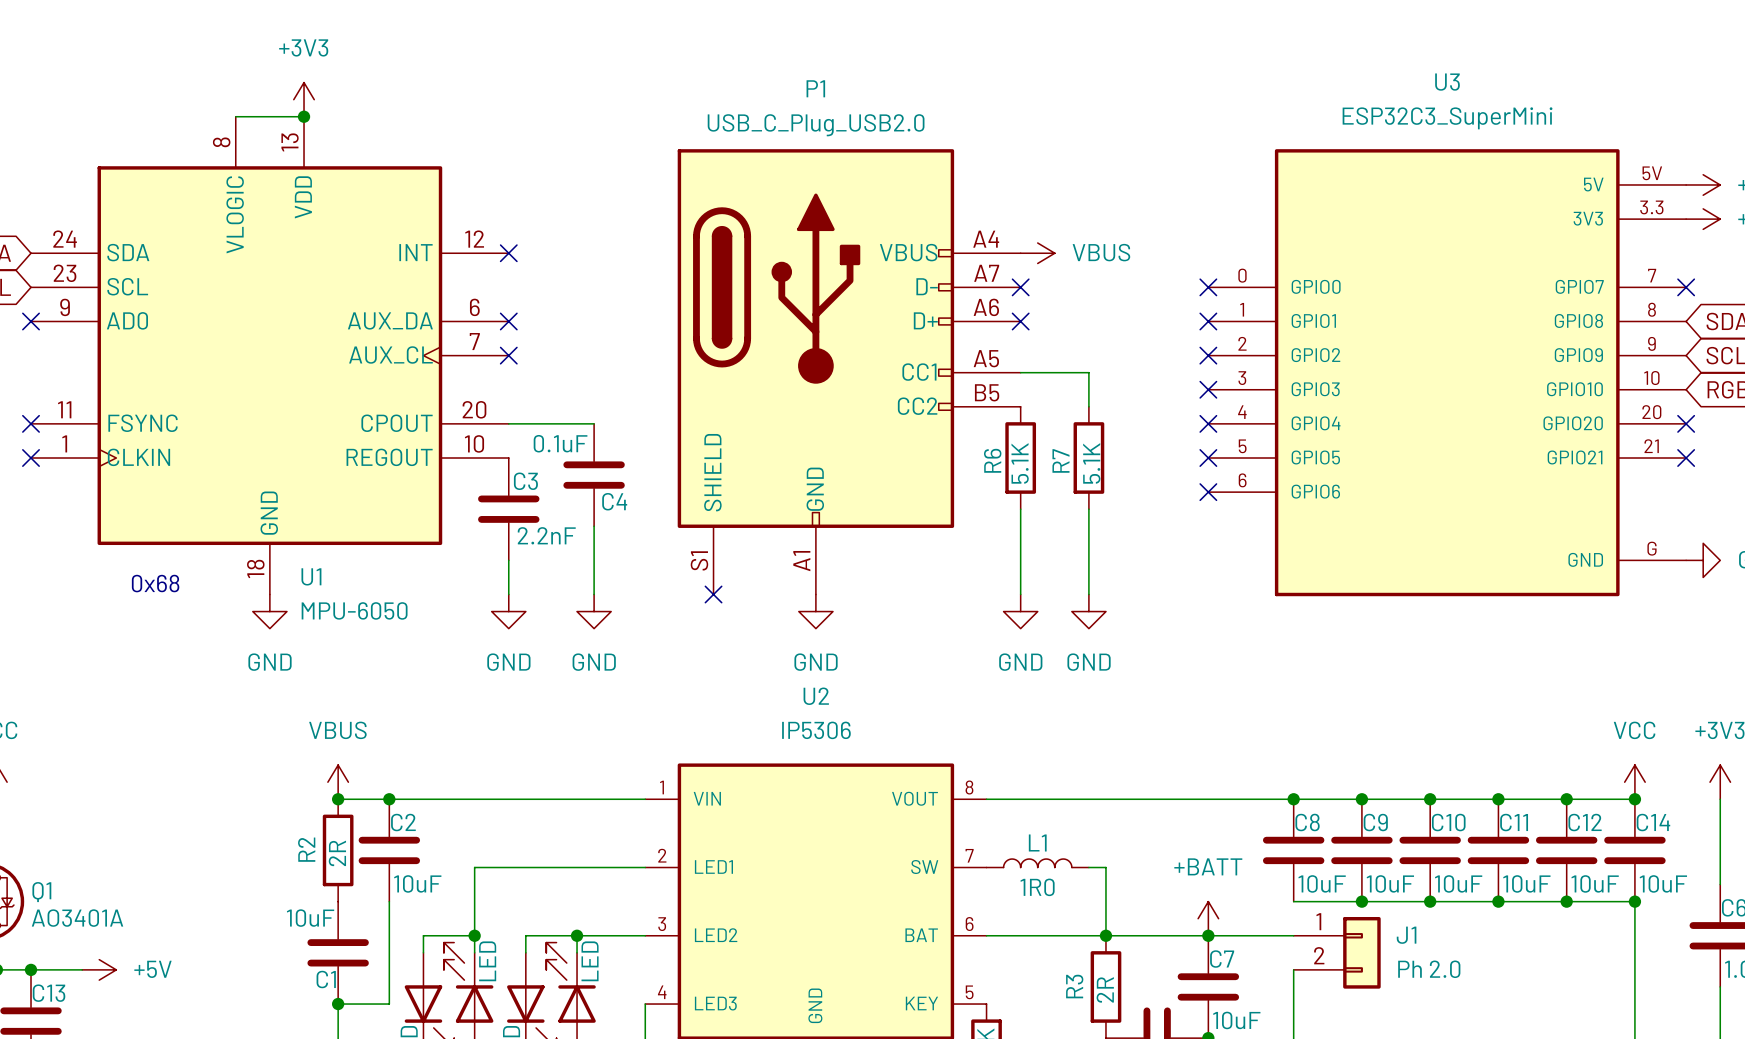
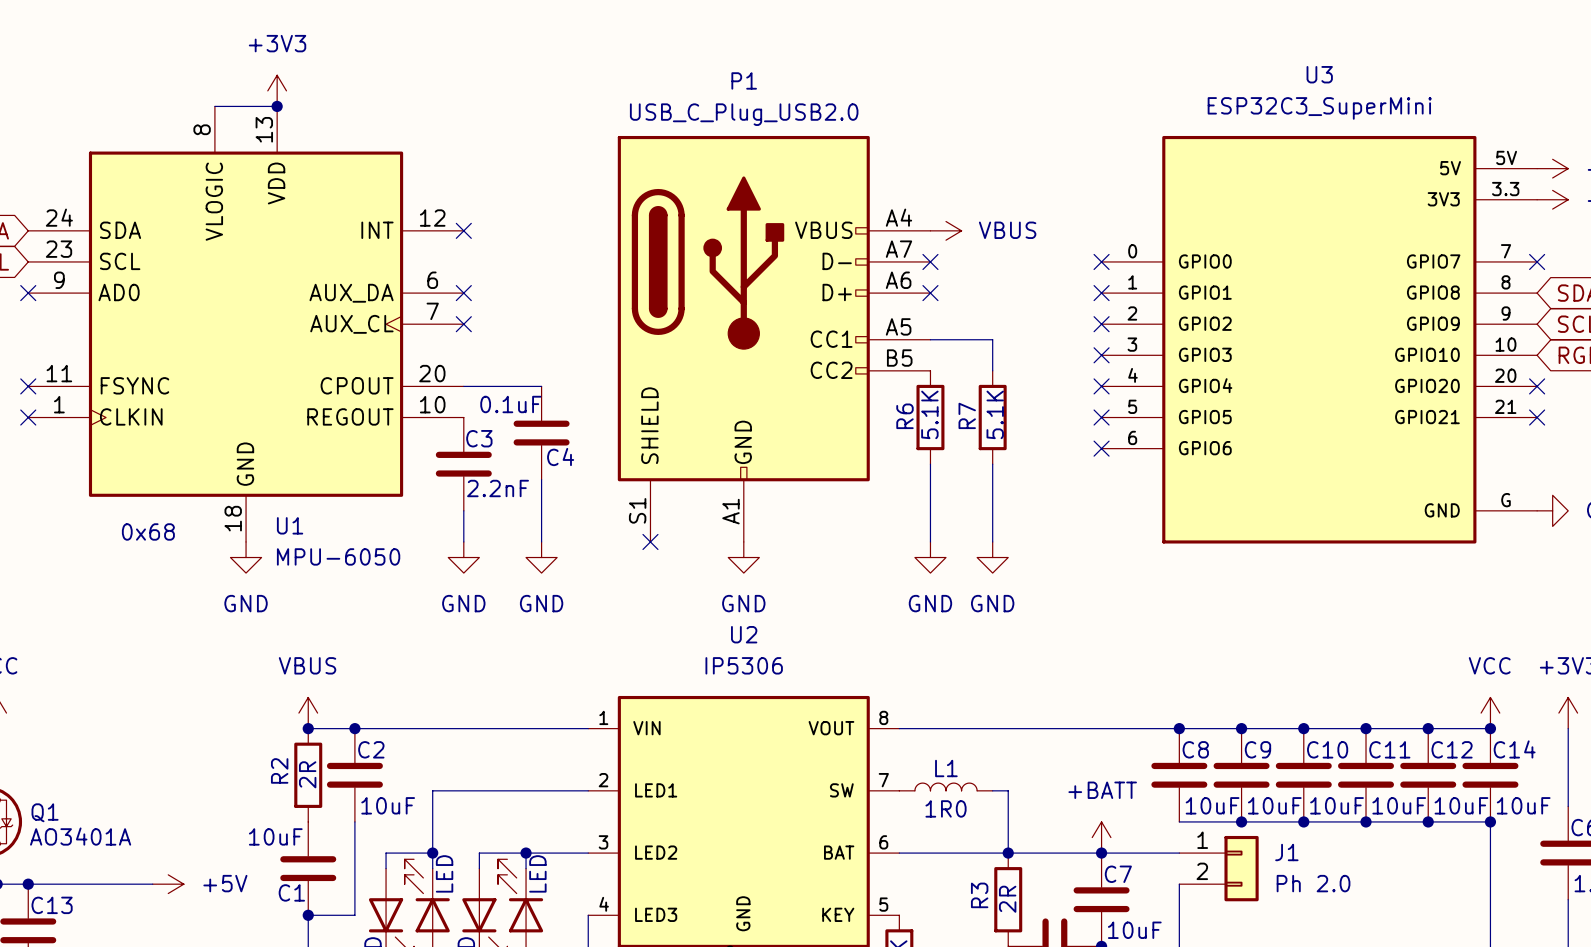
wire: none -> (74, 884) (152, 884)
power symbol position: +5V (99, 969) -> +5V (168, 884)

